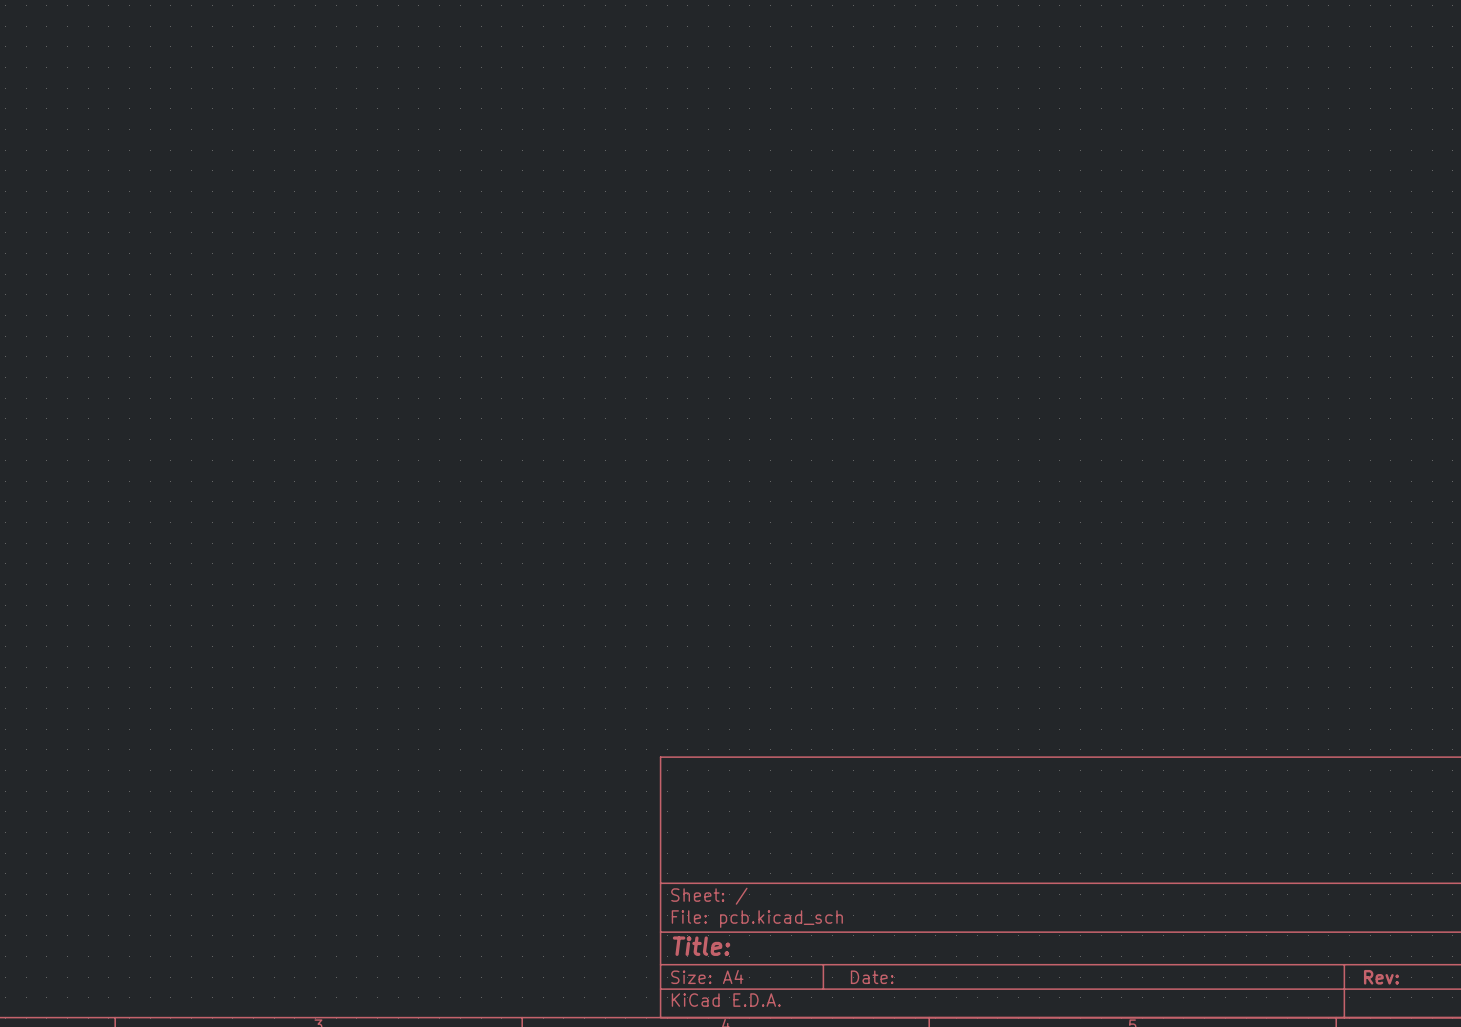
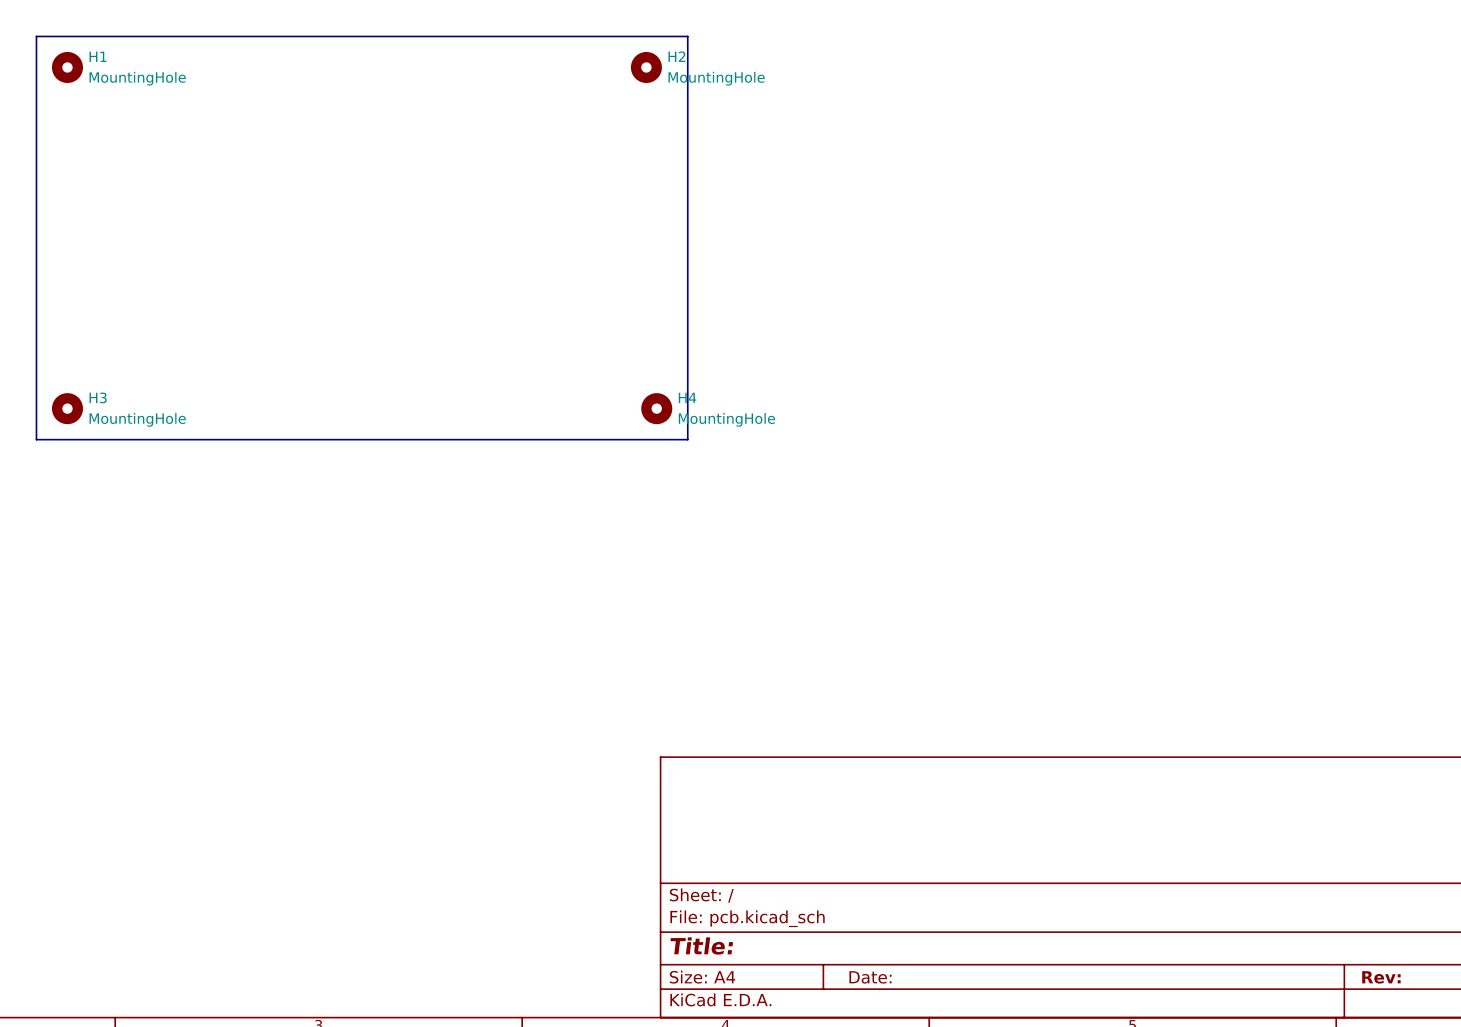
line: none -> (36, 36) (687, 36) (687, 439) (36, 439) (36, 36)
H1: none -> MountingHole (67, 67)
H2: none -> MountingHole (646, 67)
H3: none -> MountingHole (67, 408)
H4: none -> MountingHole (656, 408)

